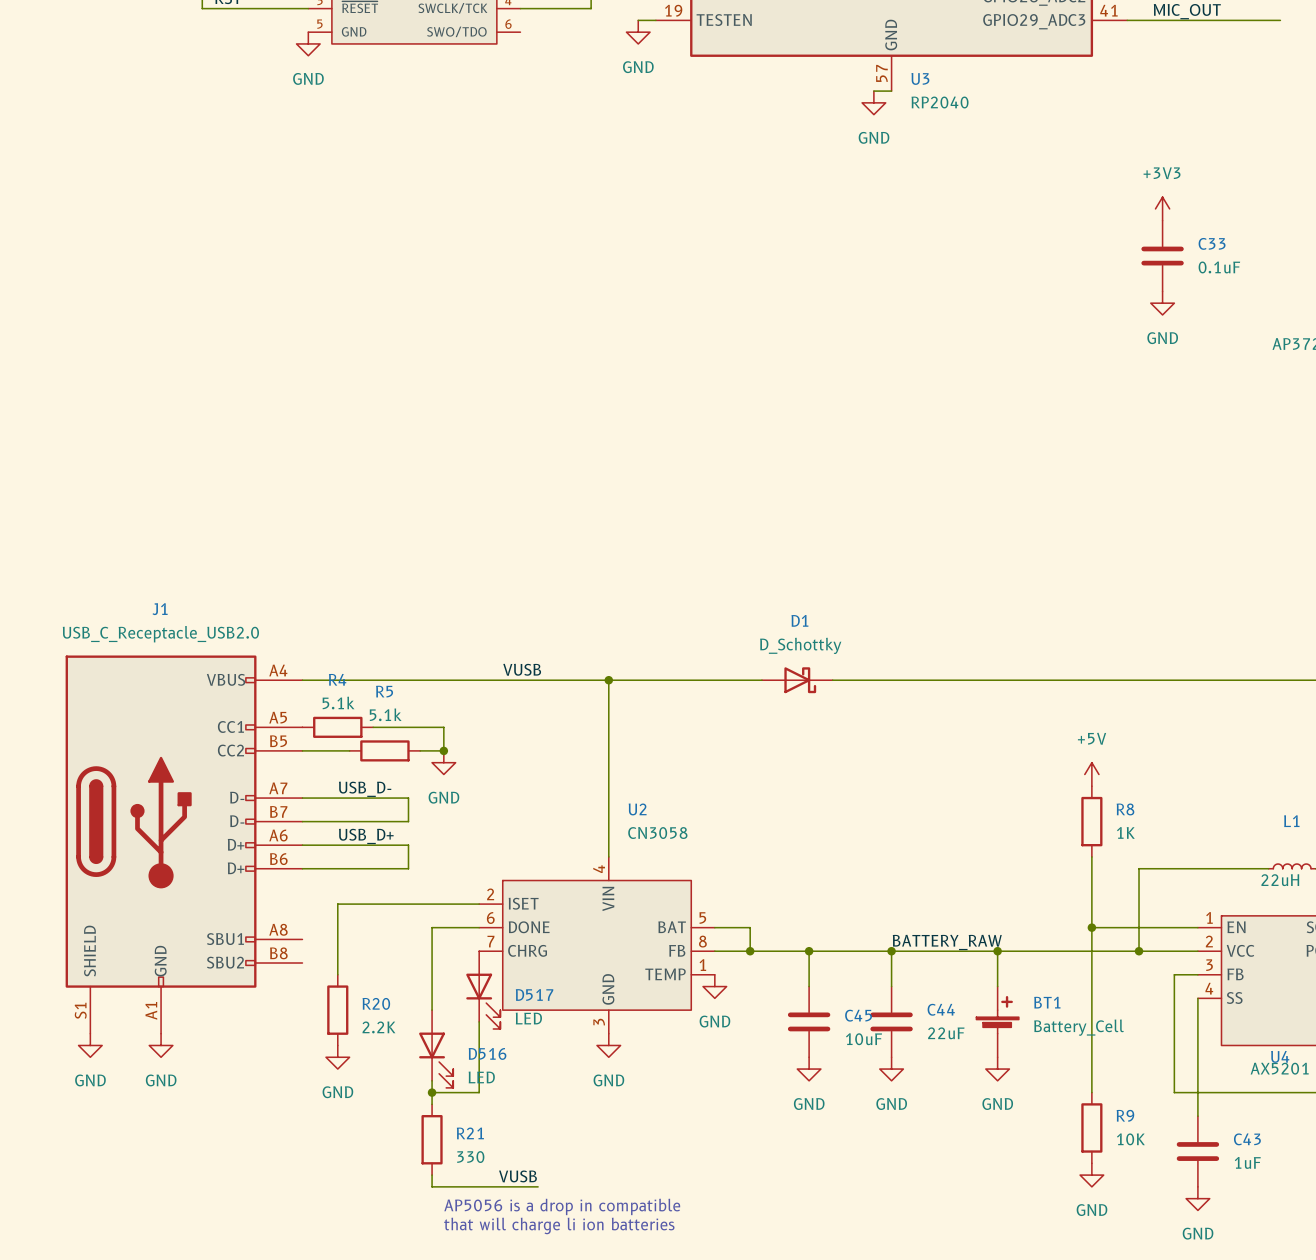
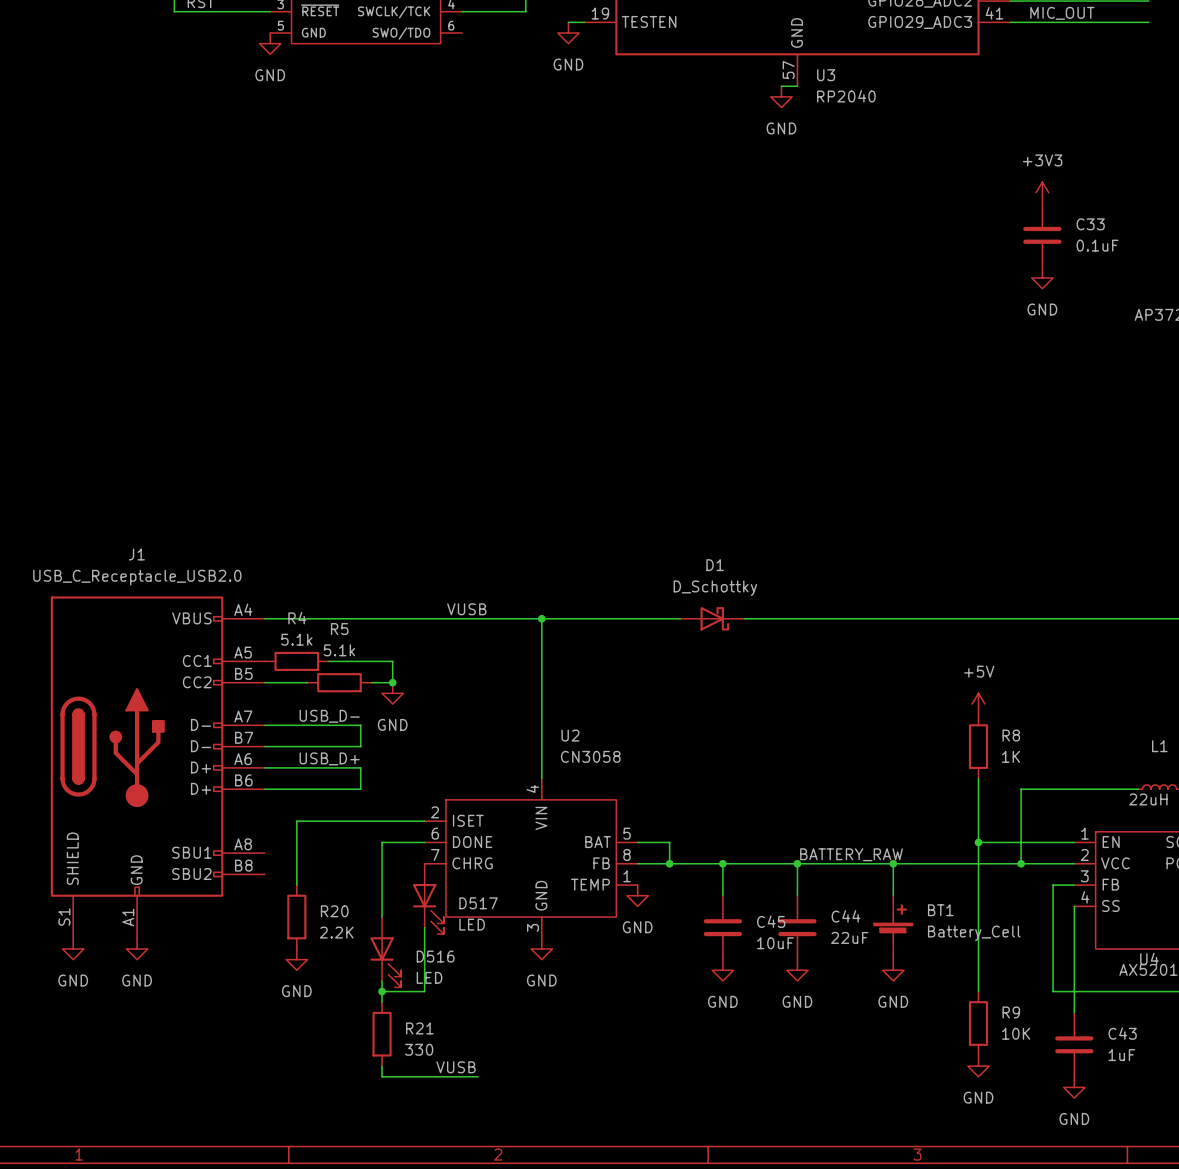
text: AP5056 is a drop in compatible (562, 1206) -> none
text: that will charge li ion batteries (559, 1225) -> none

